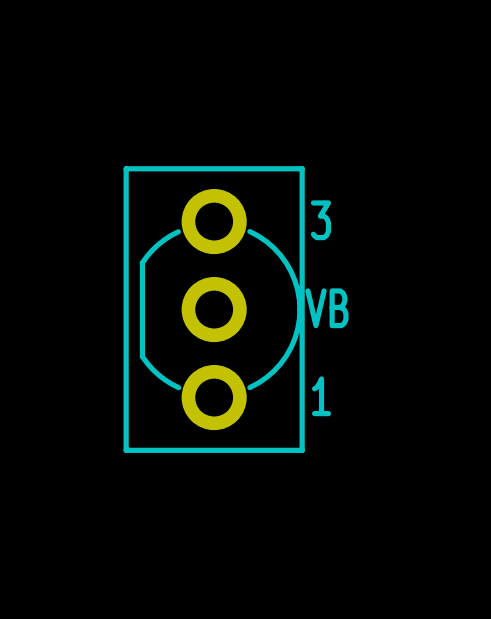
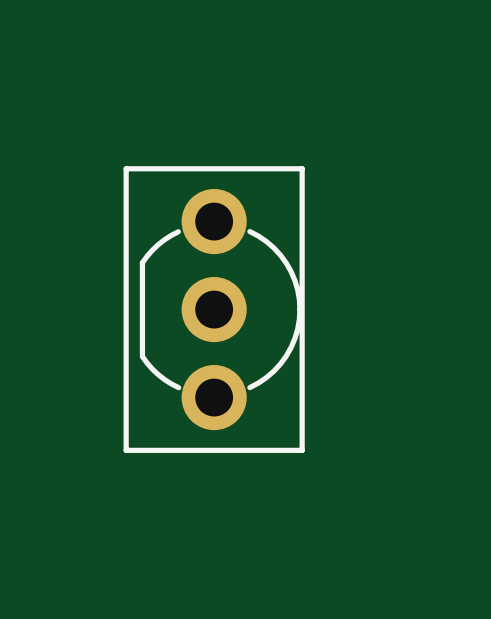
text: 3 (320, 220) -> none
text: VB (326, 308) -> none
text: 1 (321, 396) -> none

